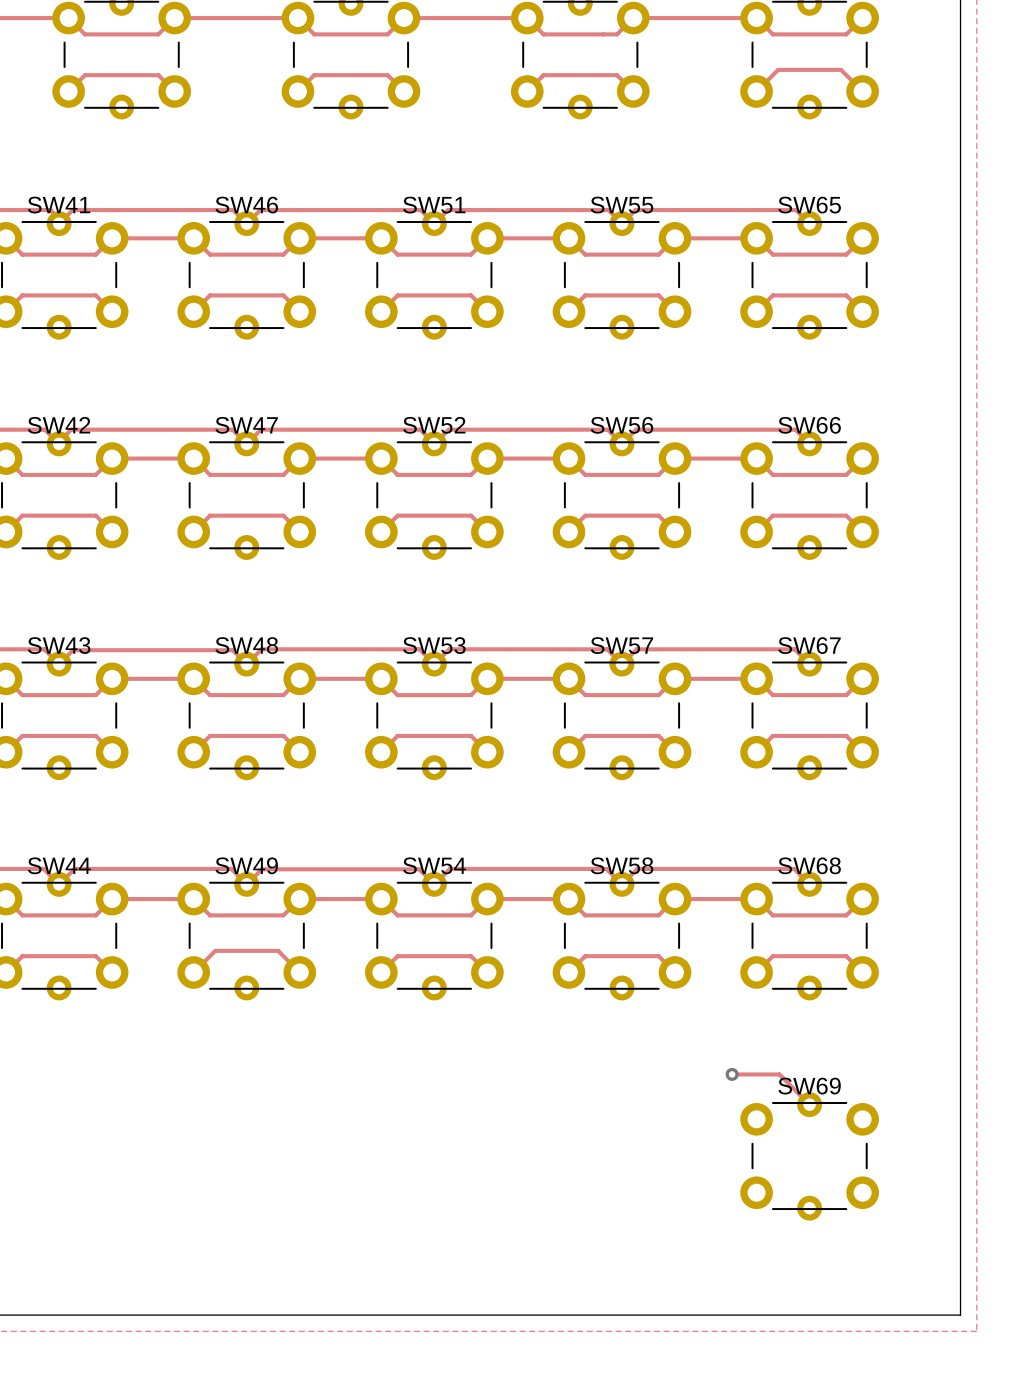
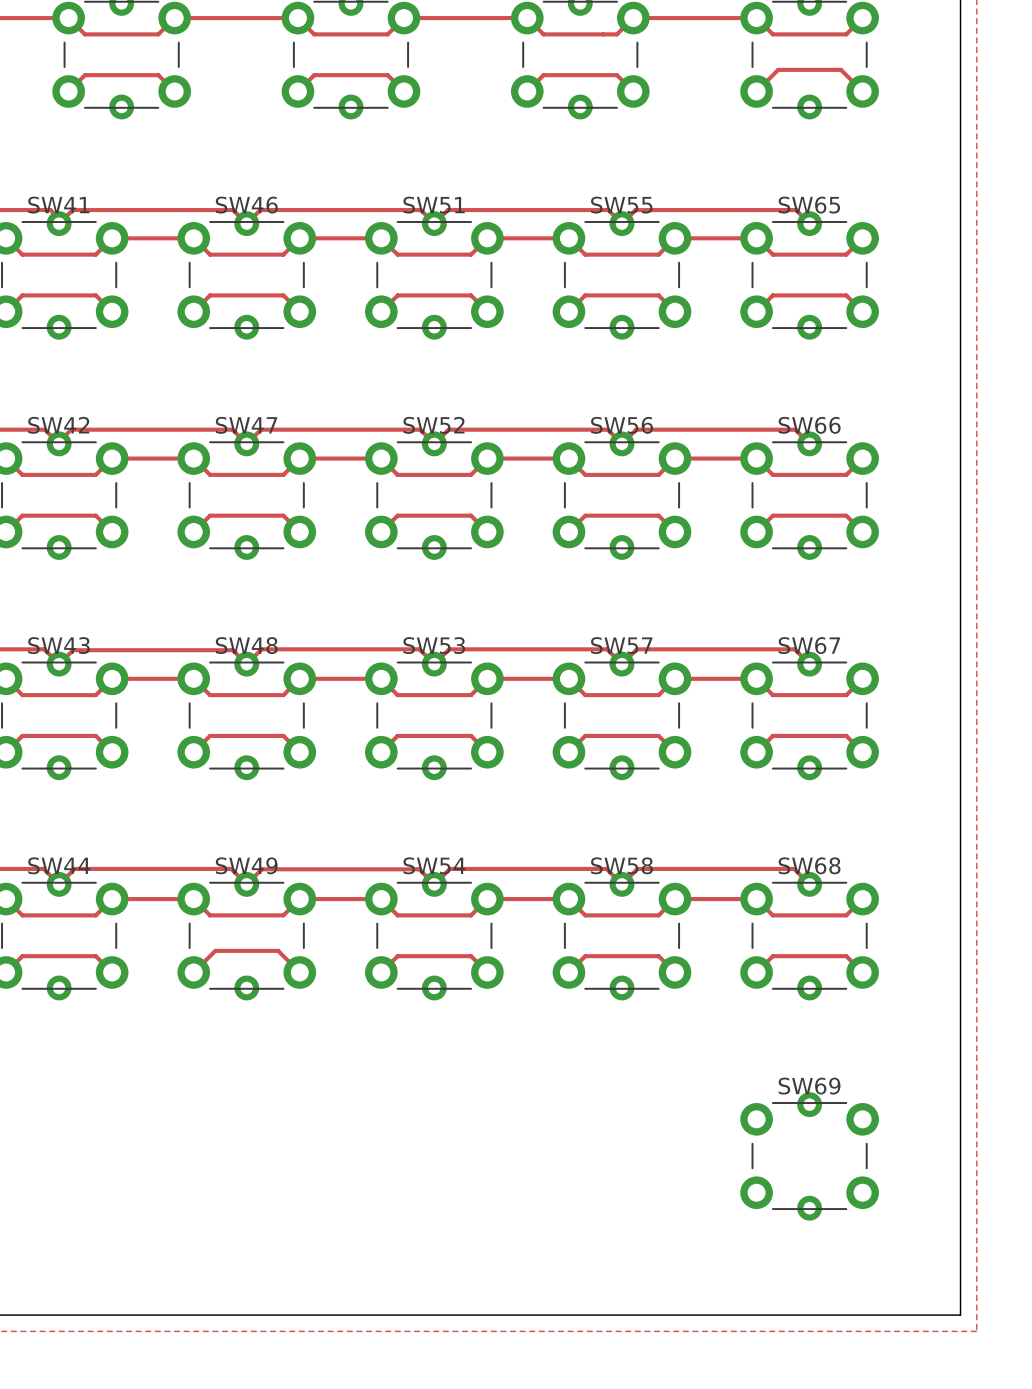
track: (732, 1074) (779, 1074) (809, 1104) -> none
via: (732, 1074) -> none

